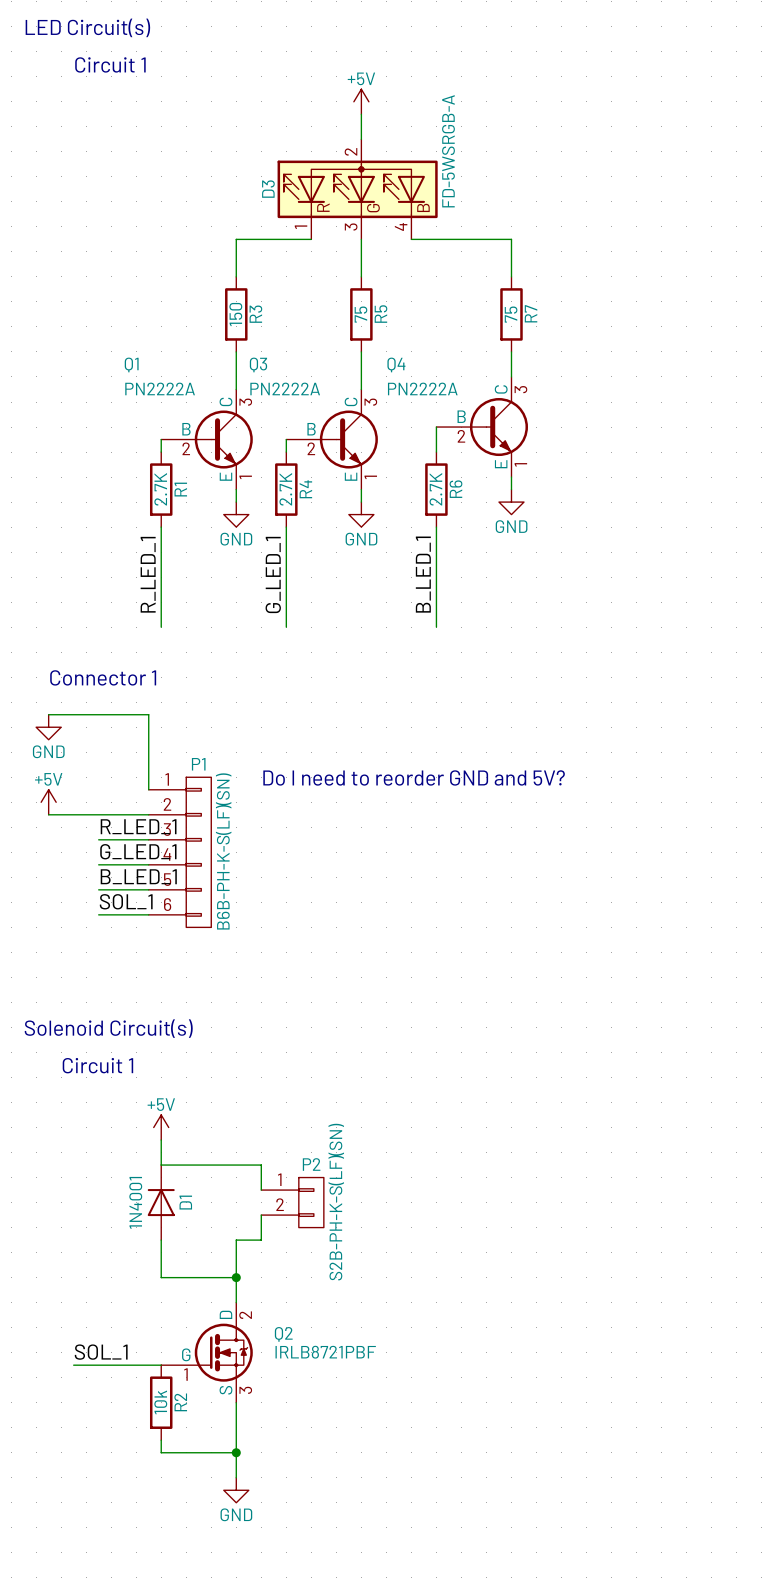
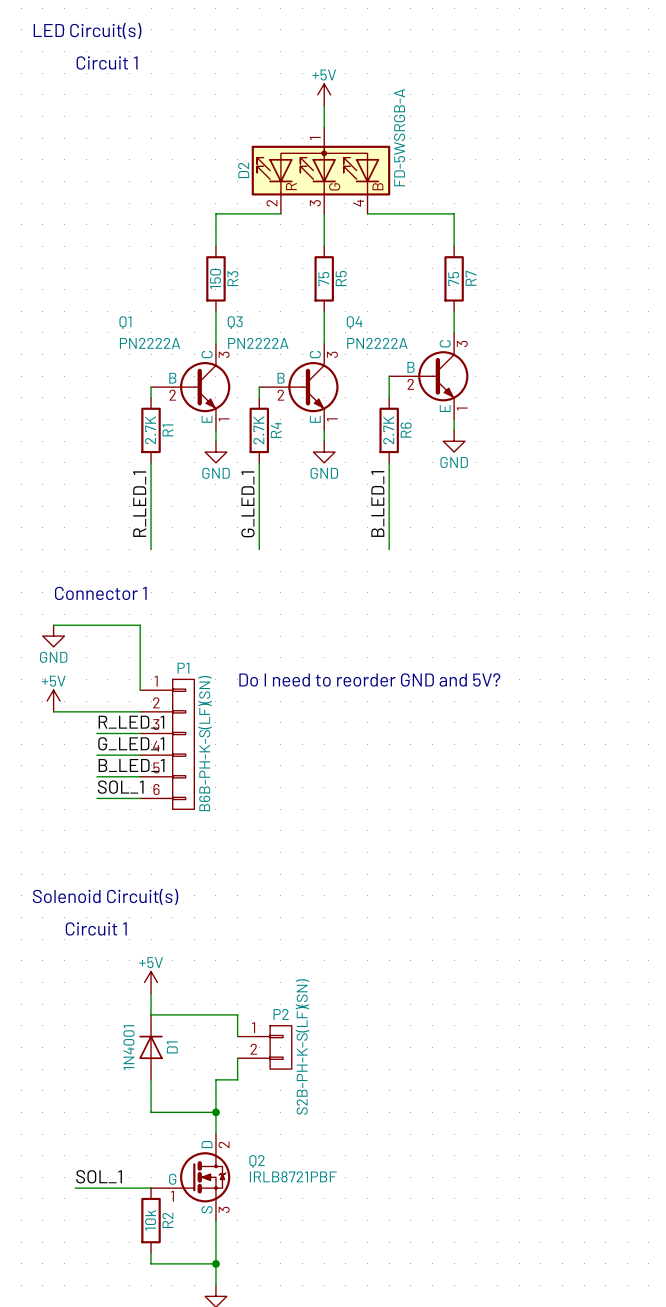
D3: FD-5WSRGB-A (357, 189) -> none
D2: none -> FD-5WSRGB-A (320, 170)

